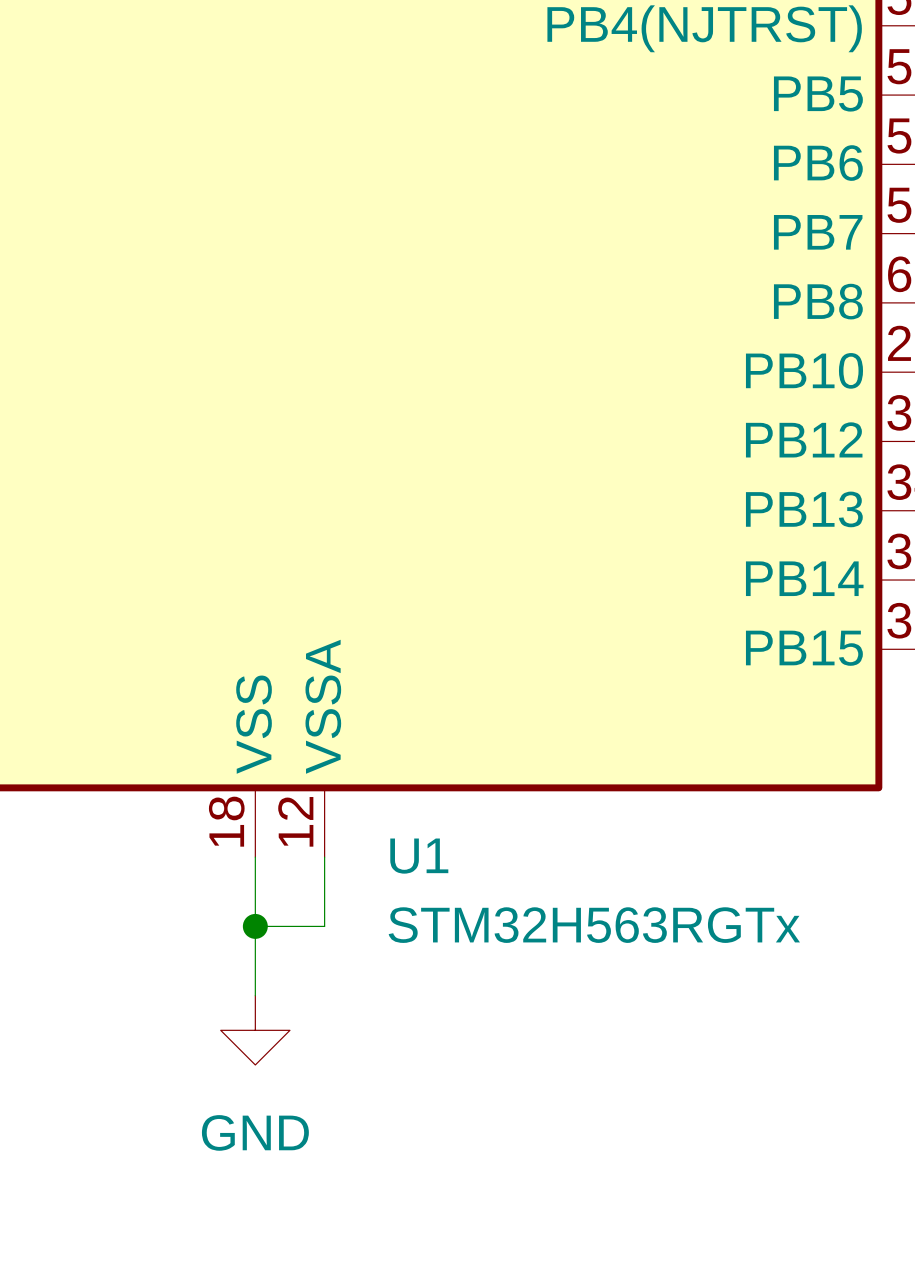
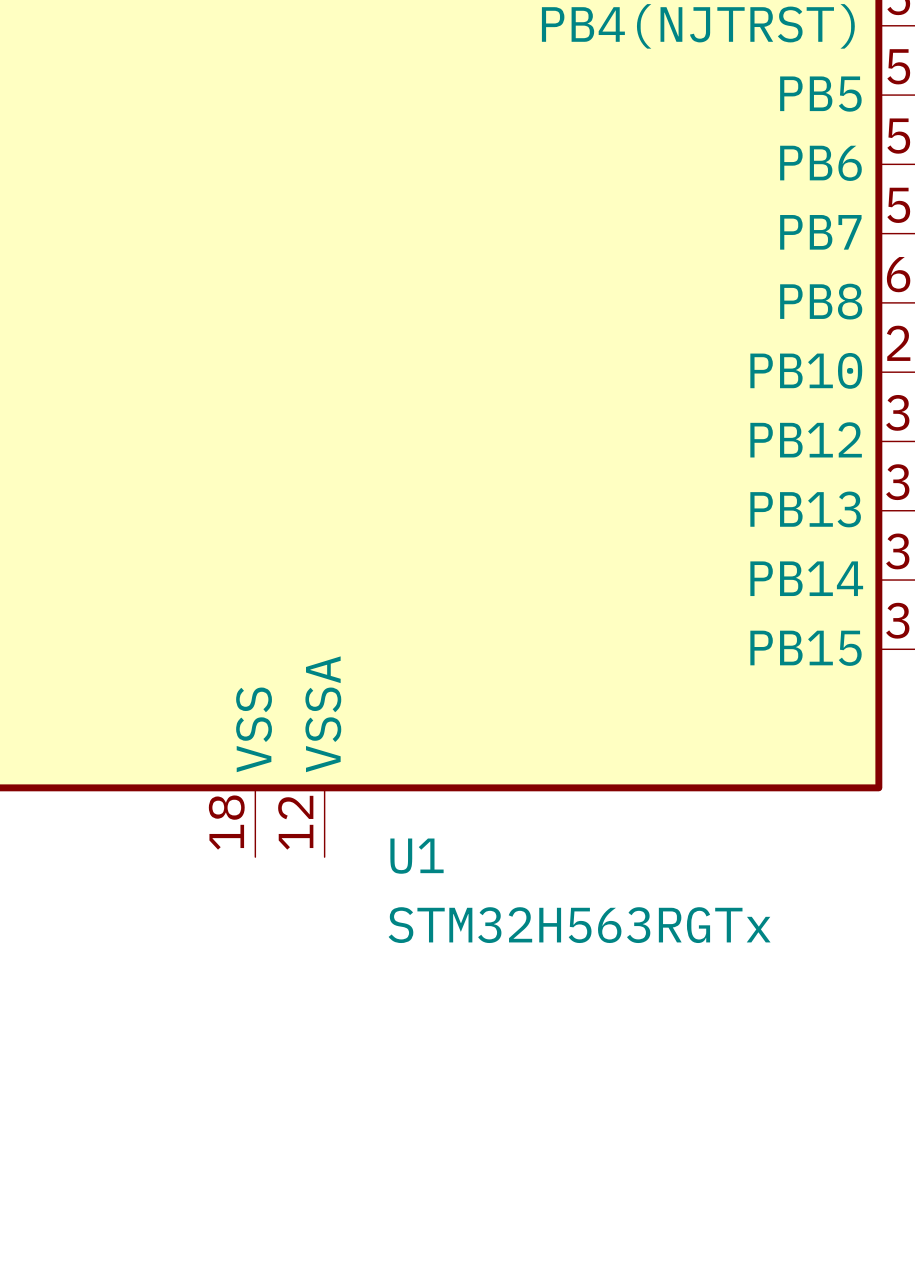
wire: (255, 857) (255, 995) -> none
wire: (324, 857) (324, 926) (255, 926) -> none
junction: (255, 926) -> none
power symbol: GND (255, 1030) -> none

